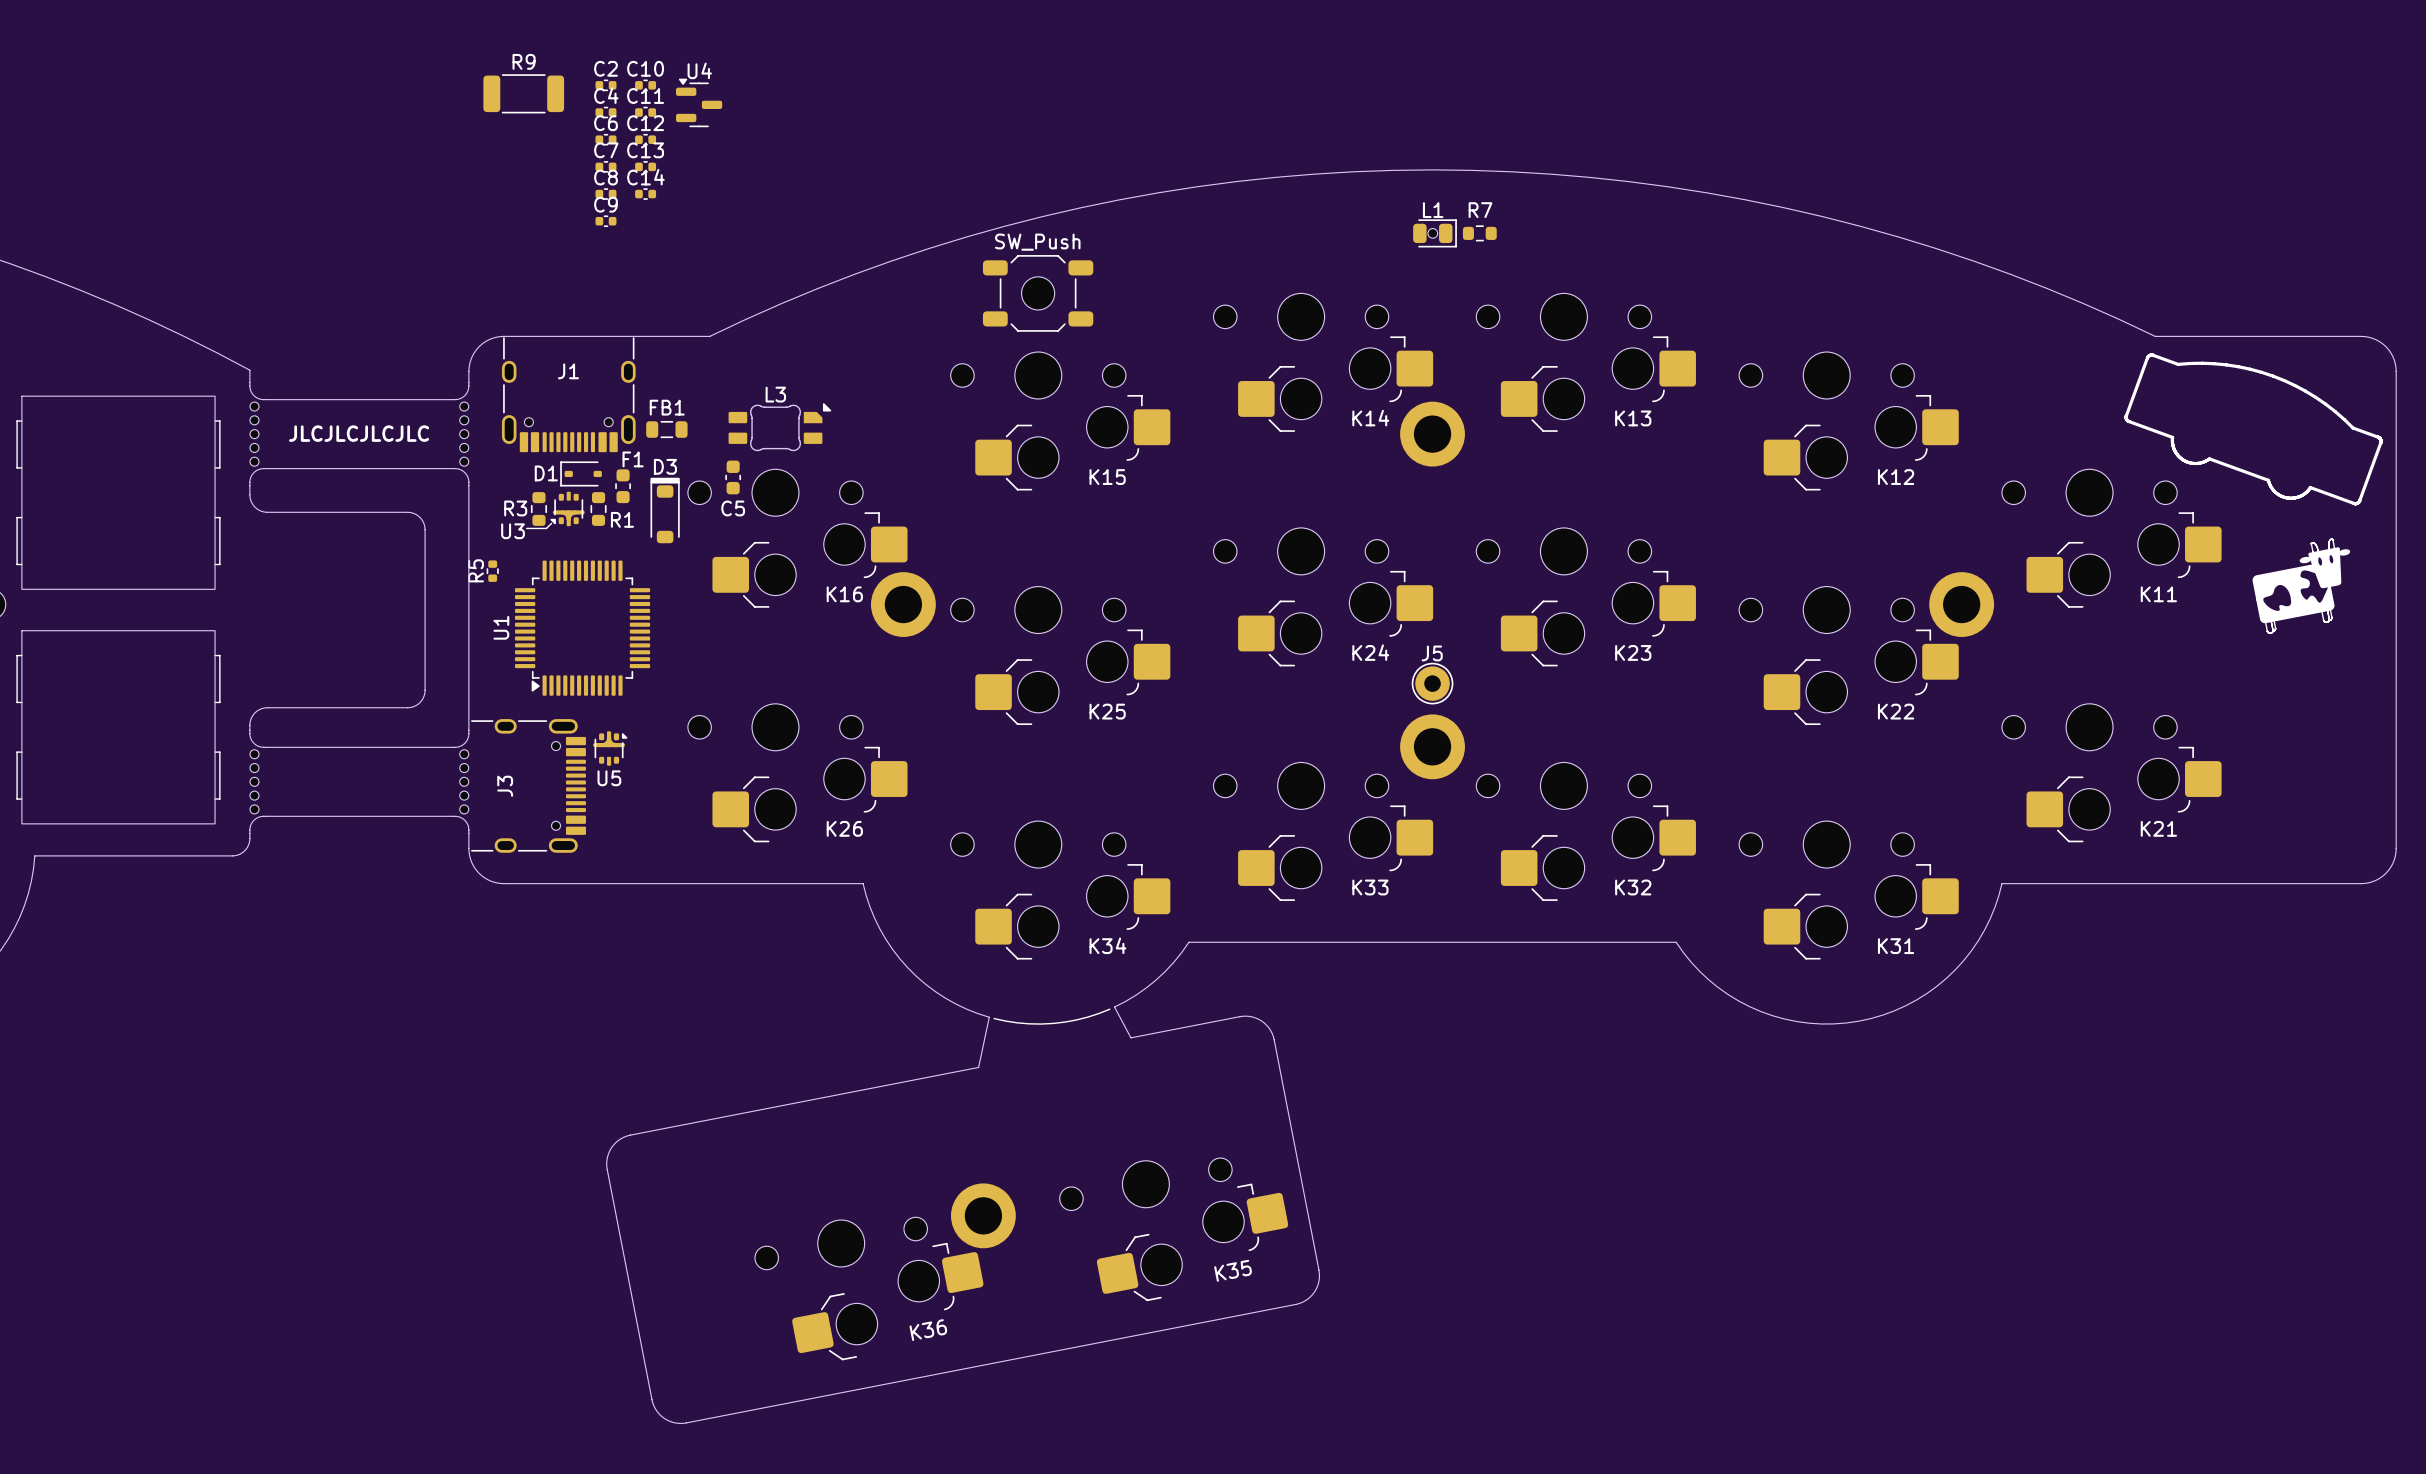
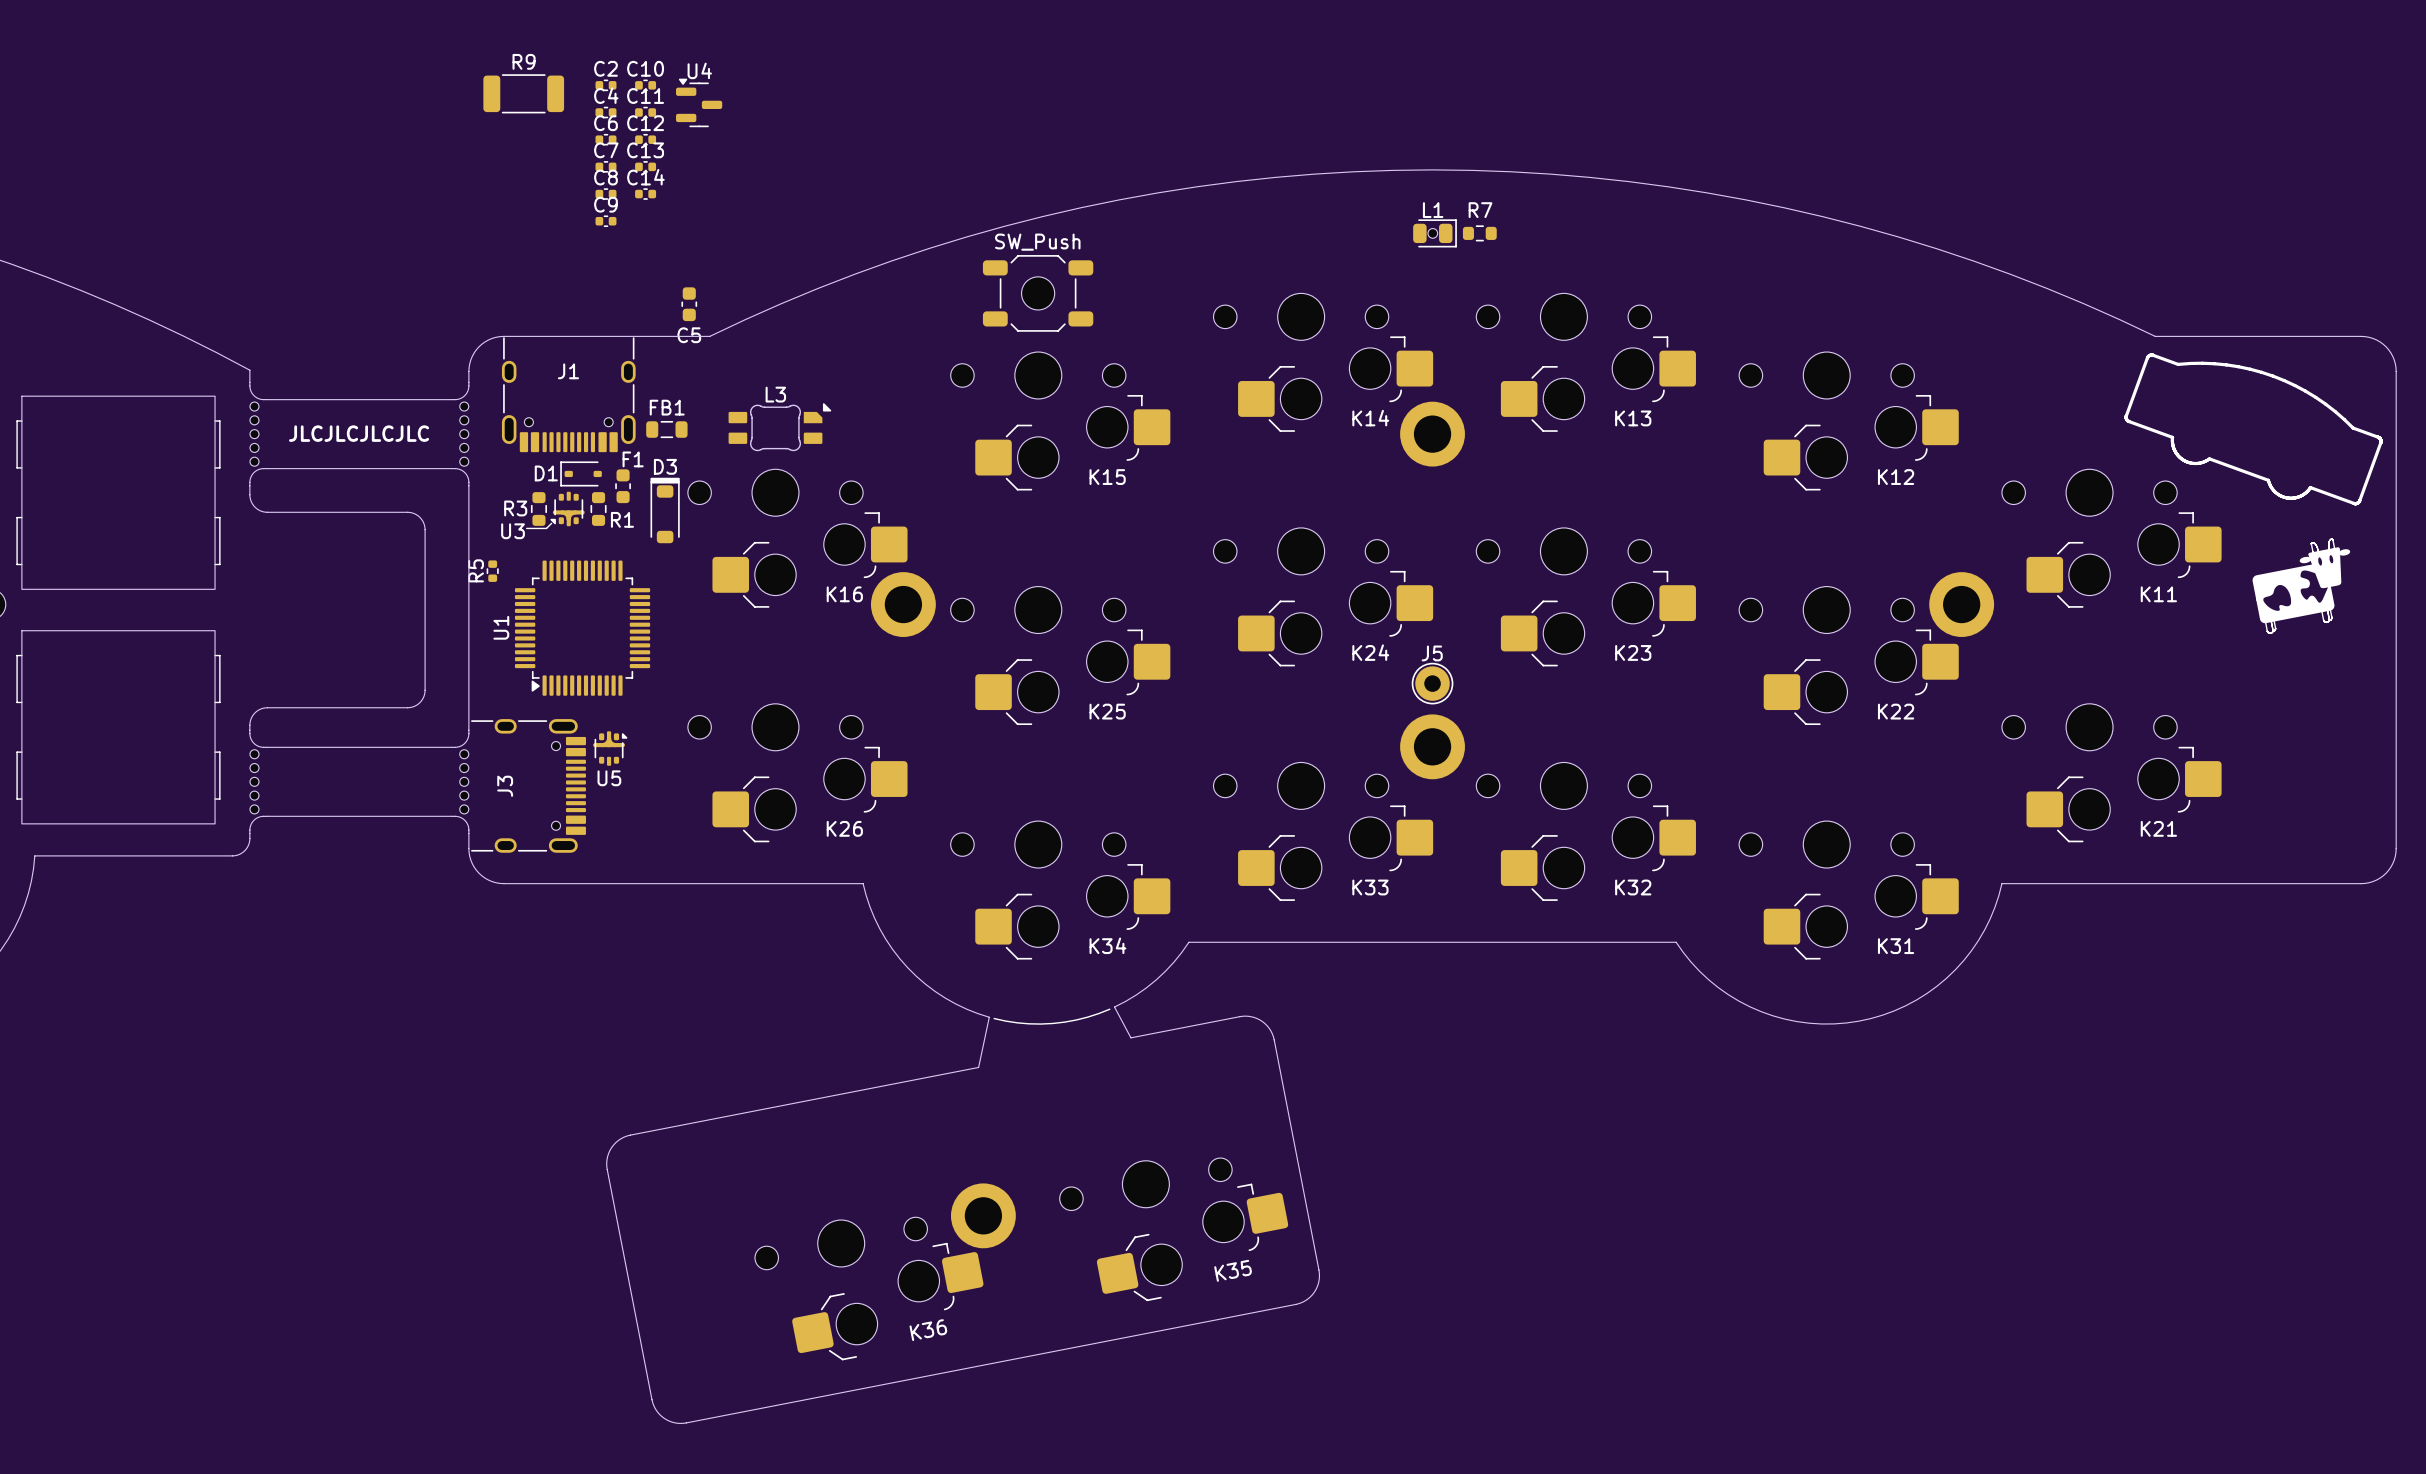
C5 position: (733, 477) -> (689, 304)

